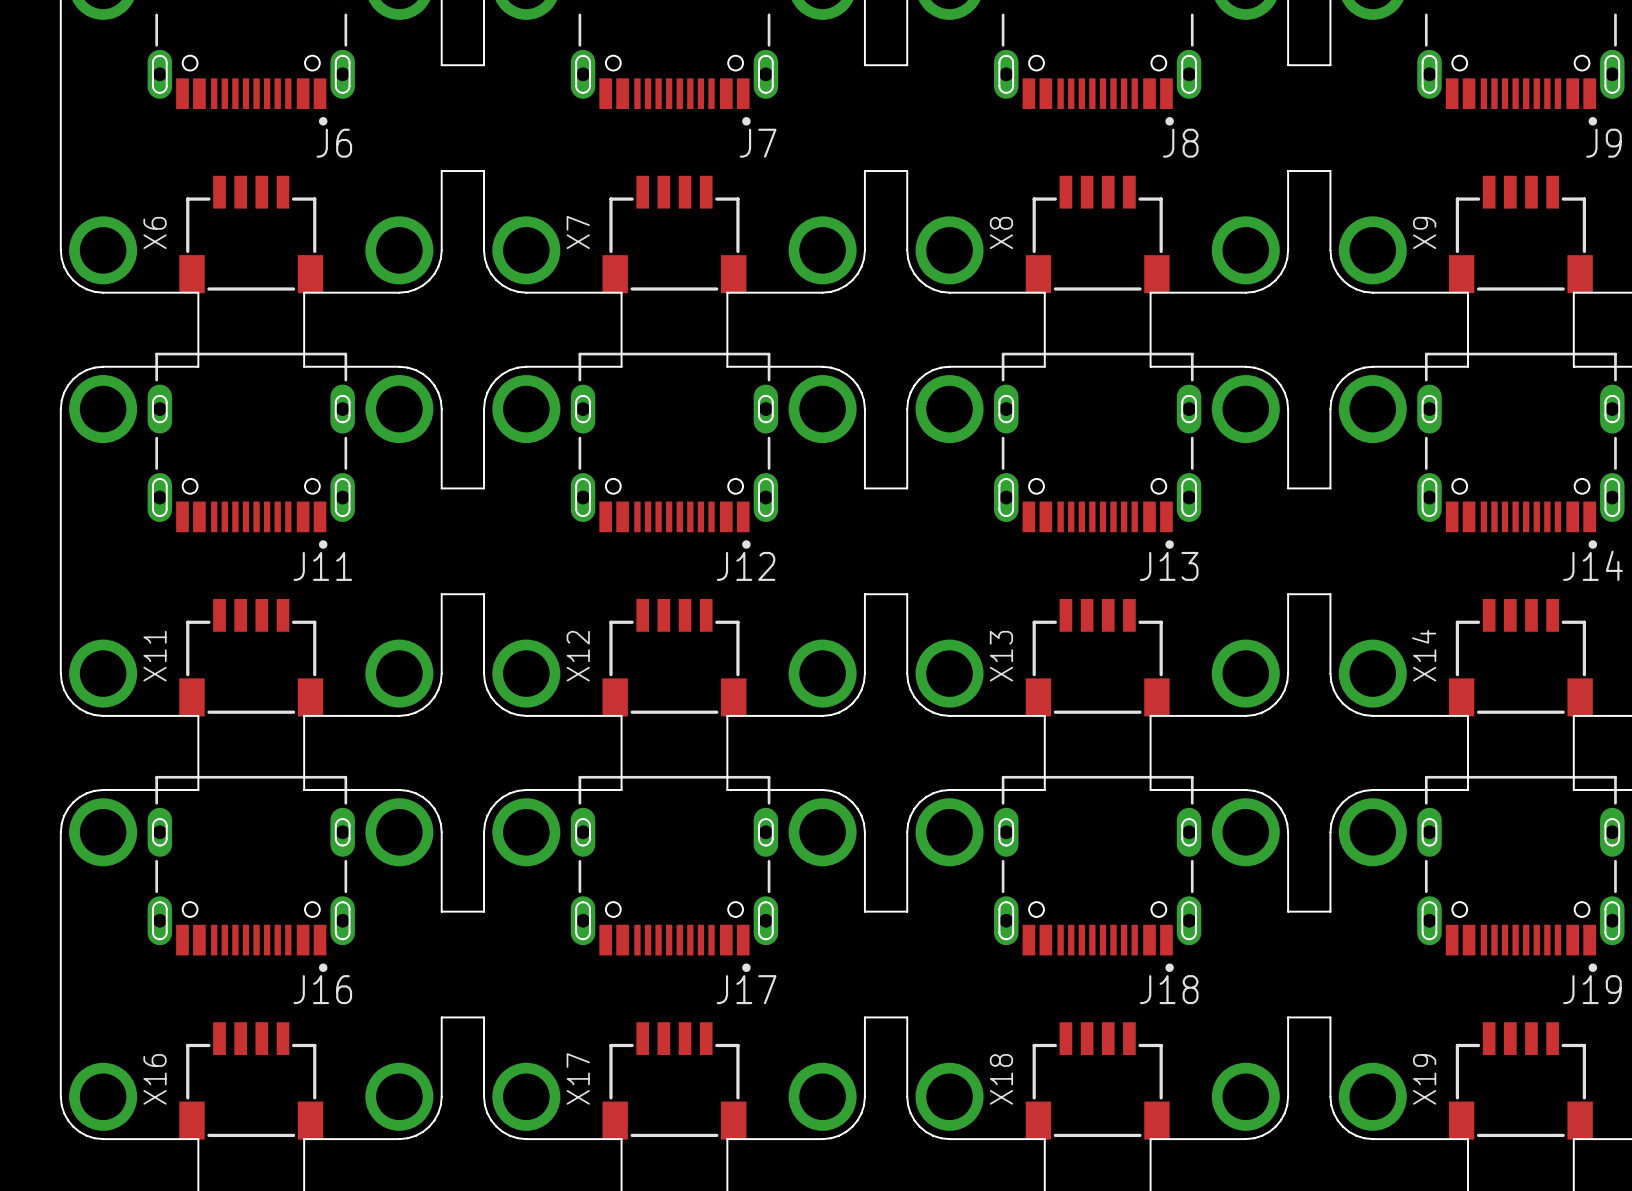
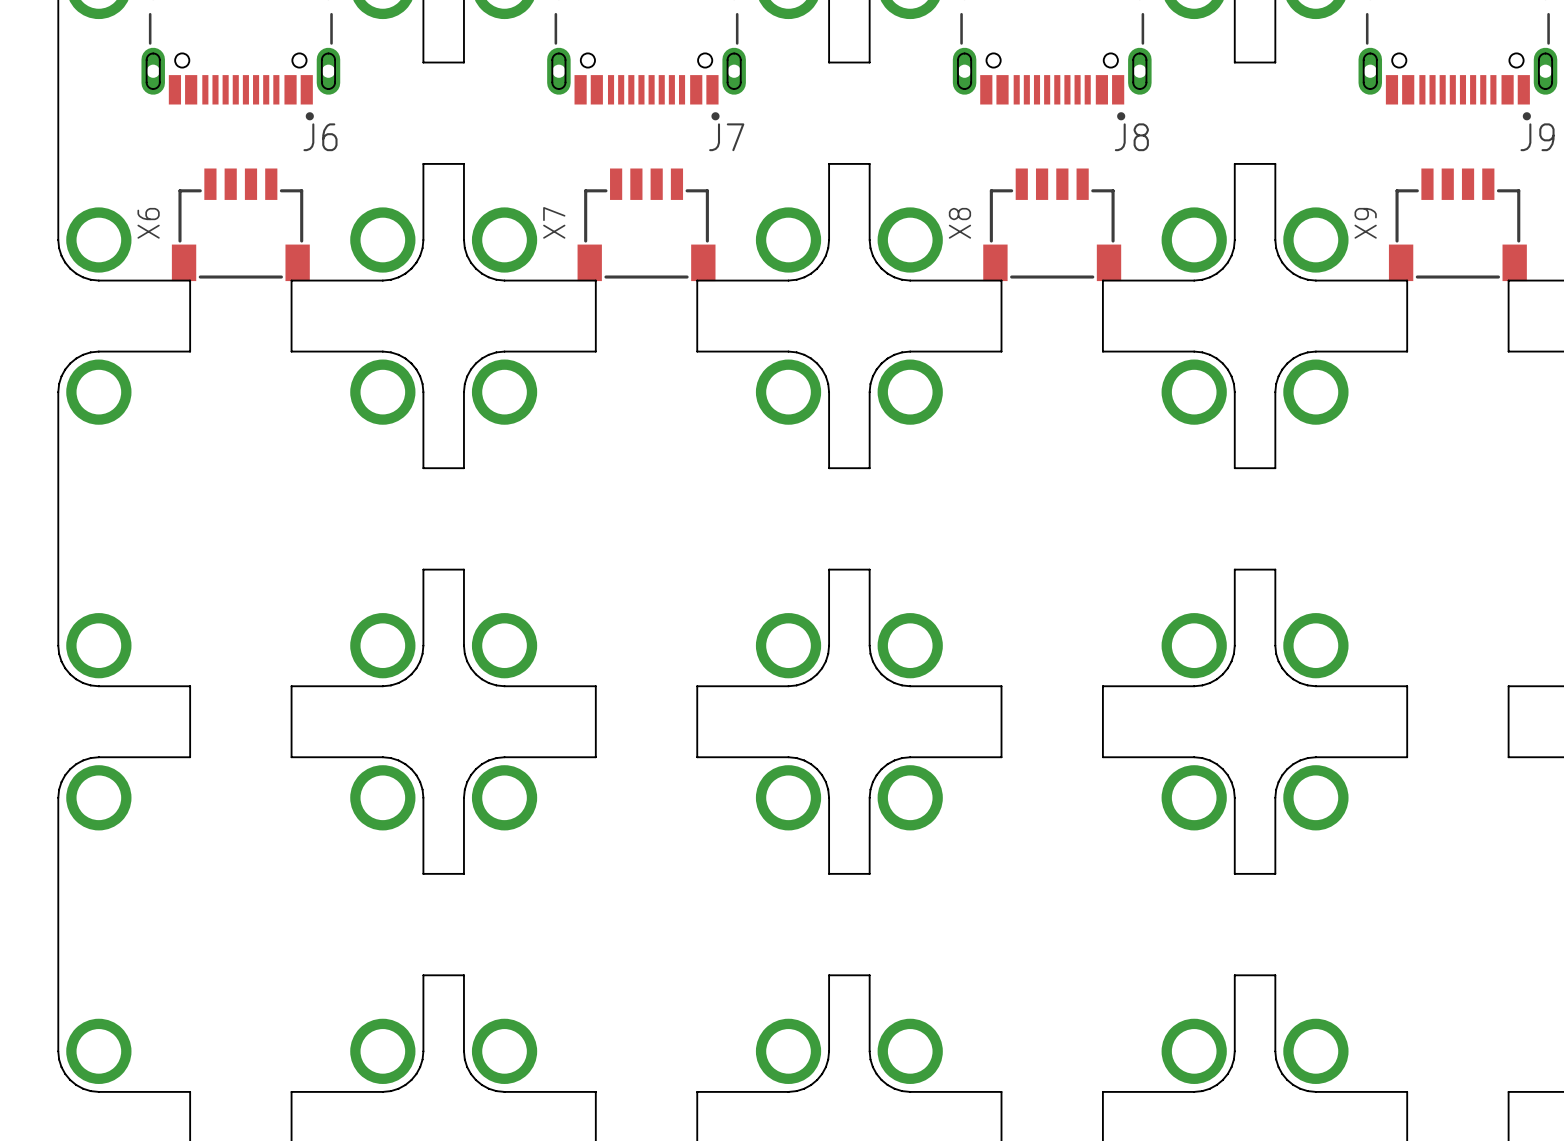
J11: (251, 450) -> none
J12: (674, 450) -> none
J13: (1097, 450) -> none
J14: (1520, 450) -> none
X11: (251, 657) -> none
X12: (674, 657) -> none
X13: (1097, 657) -> none
X14: (1520, 657) -> none
J16: (251, 873) -> none
J17: (674, 873) -> none
J18: (1097, 873) -> none
J19: (1520, 873) -> none
X16: (251, 1080) -> none
X17: (674, 1080) -> none
X18: (1097, 1080) -> none
X19: (1520, 1080) -> none

